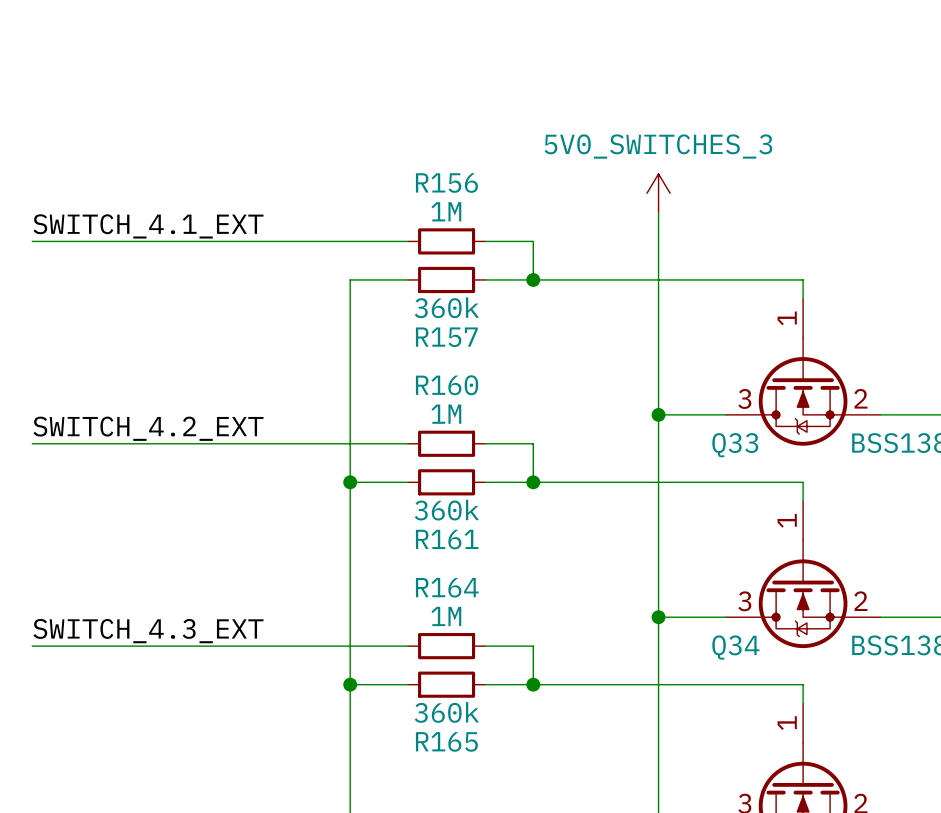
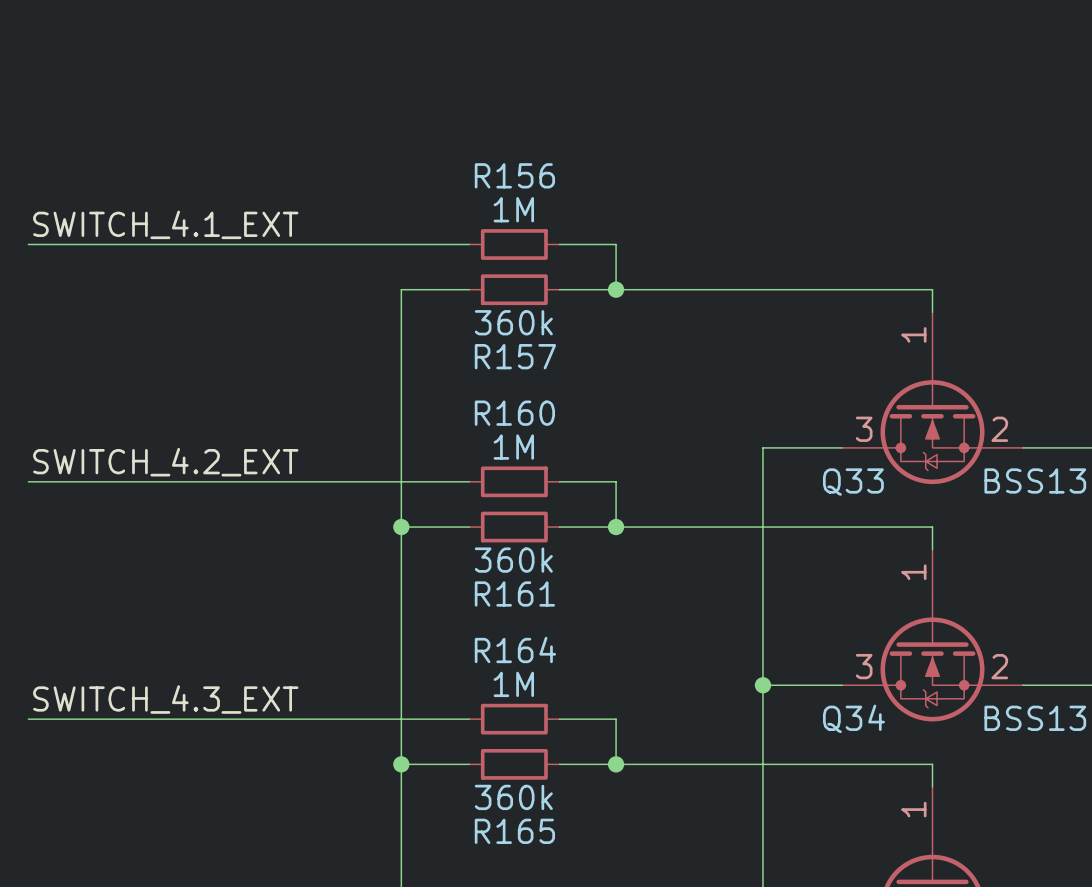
power symbol: 5V0_SWITCHES_3 (658, 193) -> none
wire: (658, 212) (658, 414) -> none
junction: (658, 414) -> none

